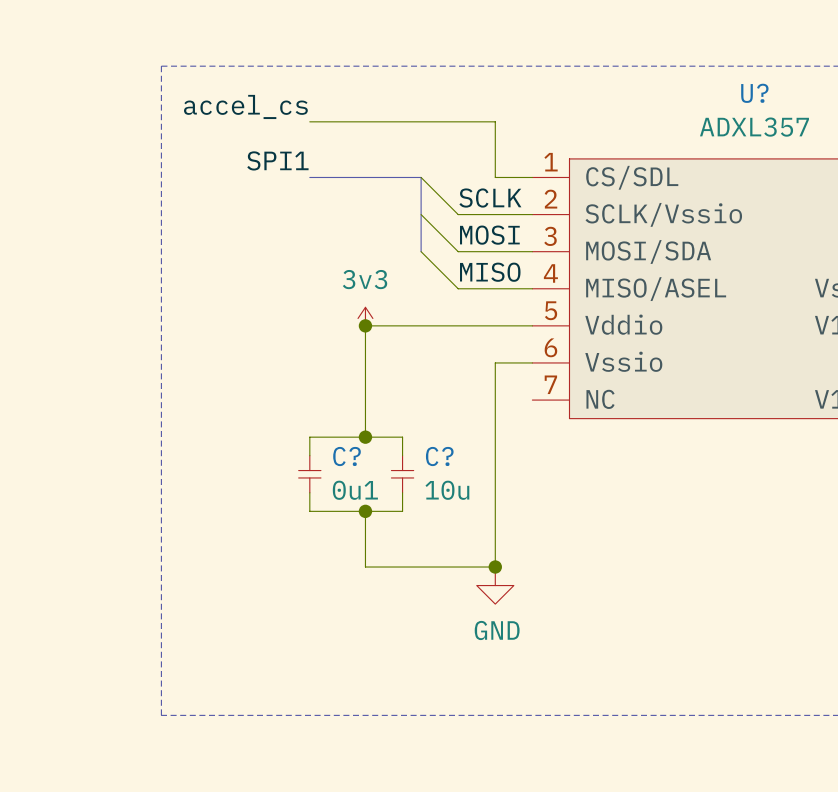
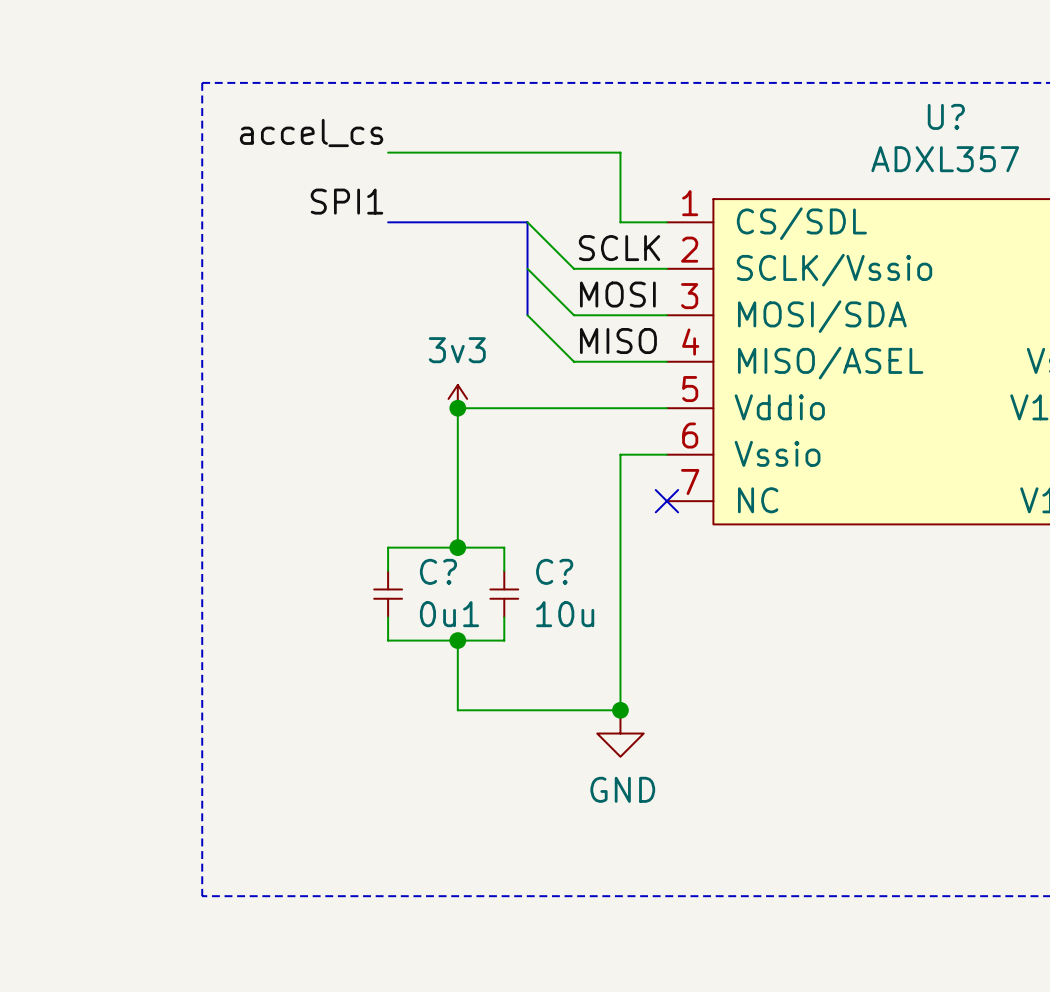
no-connect mark: none -> (666, 501)

